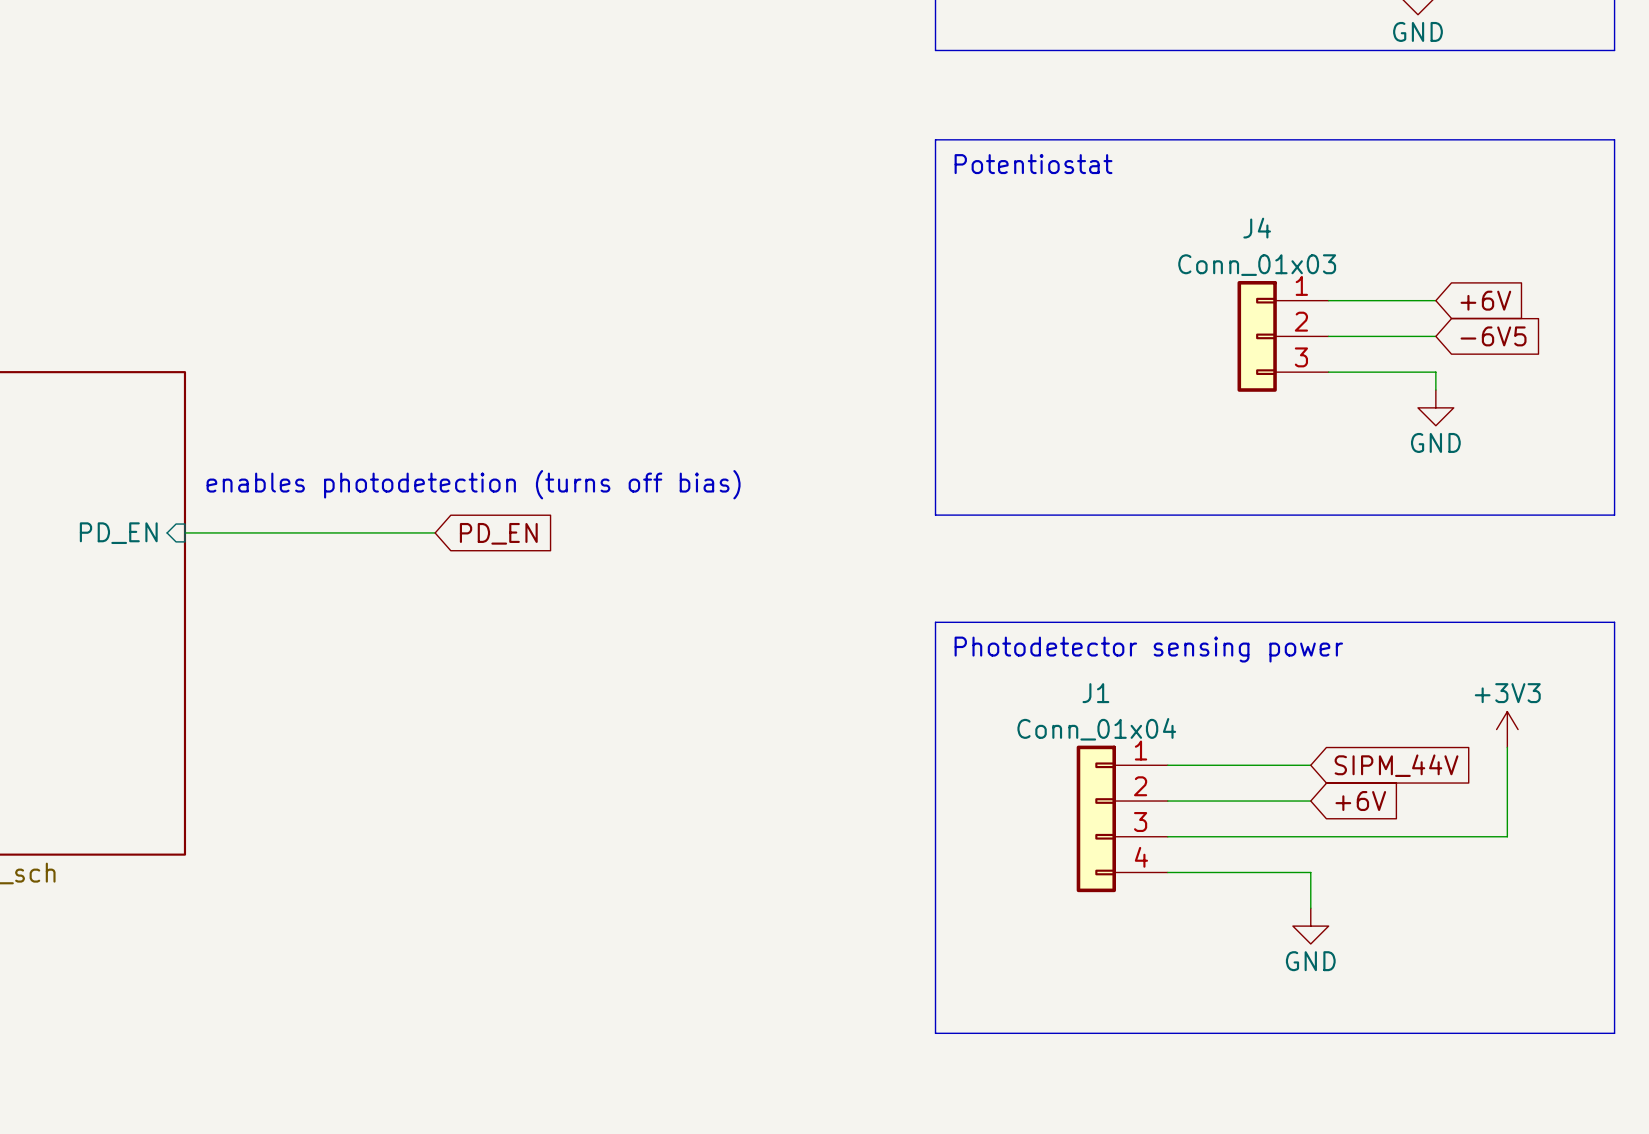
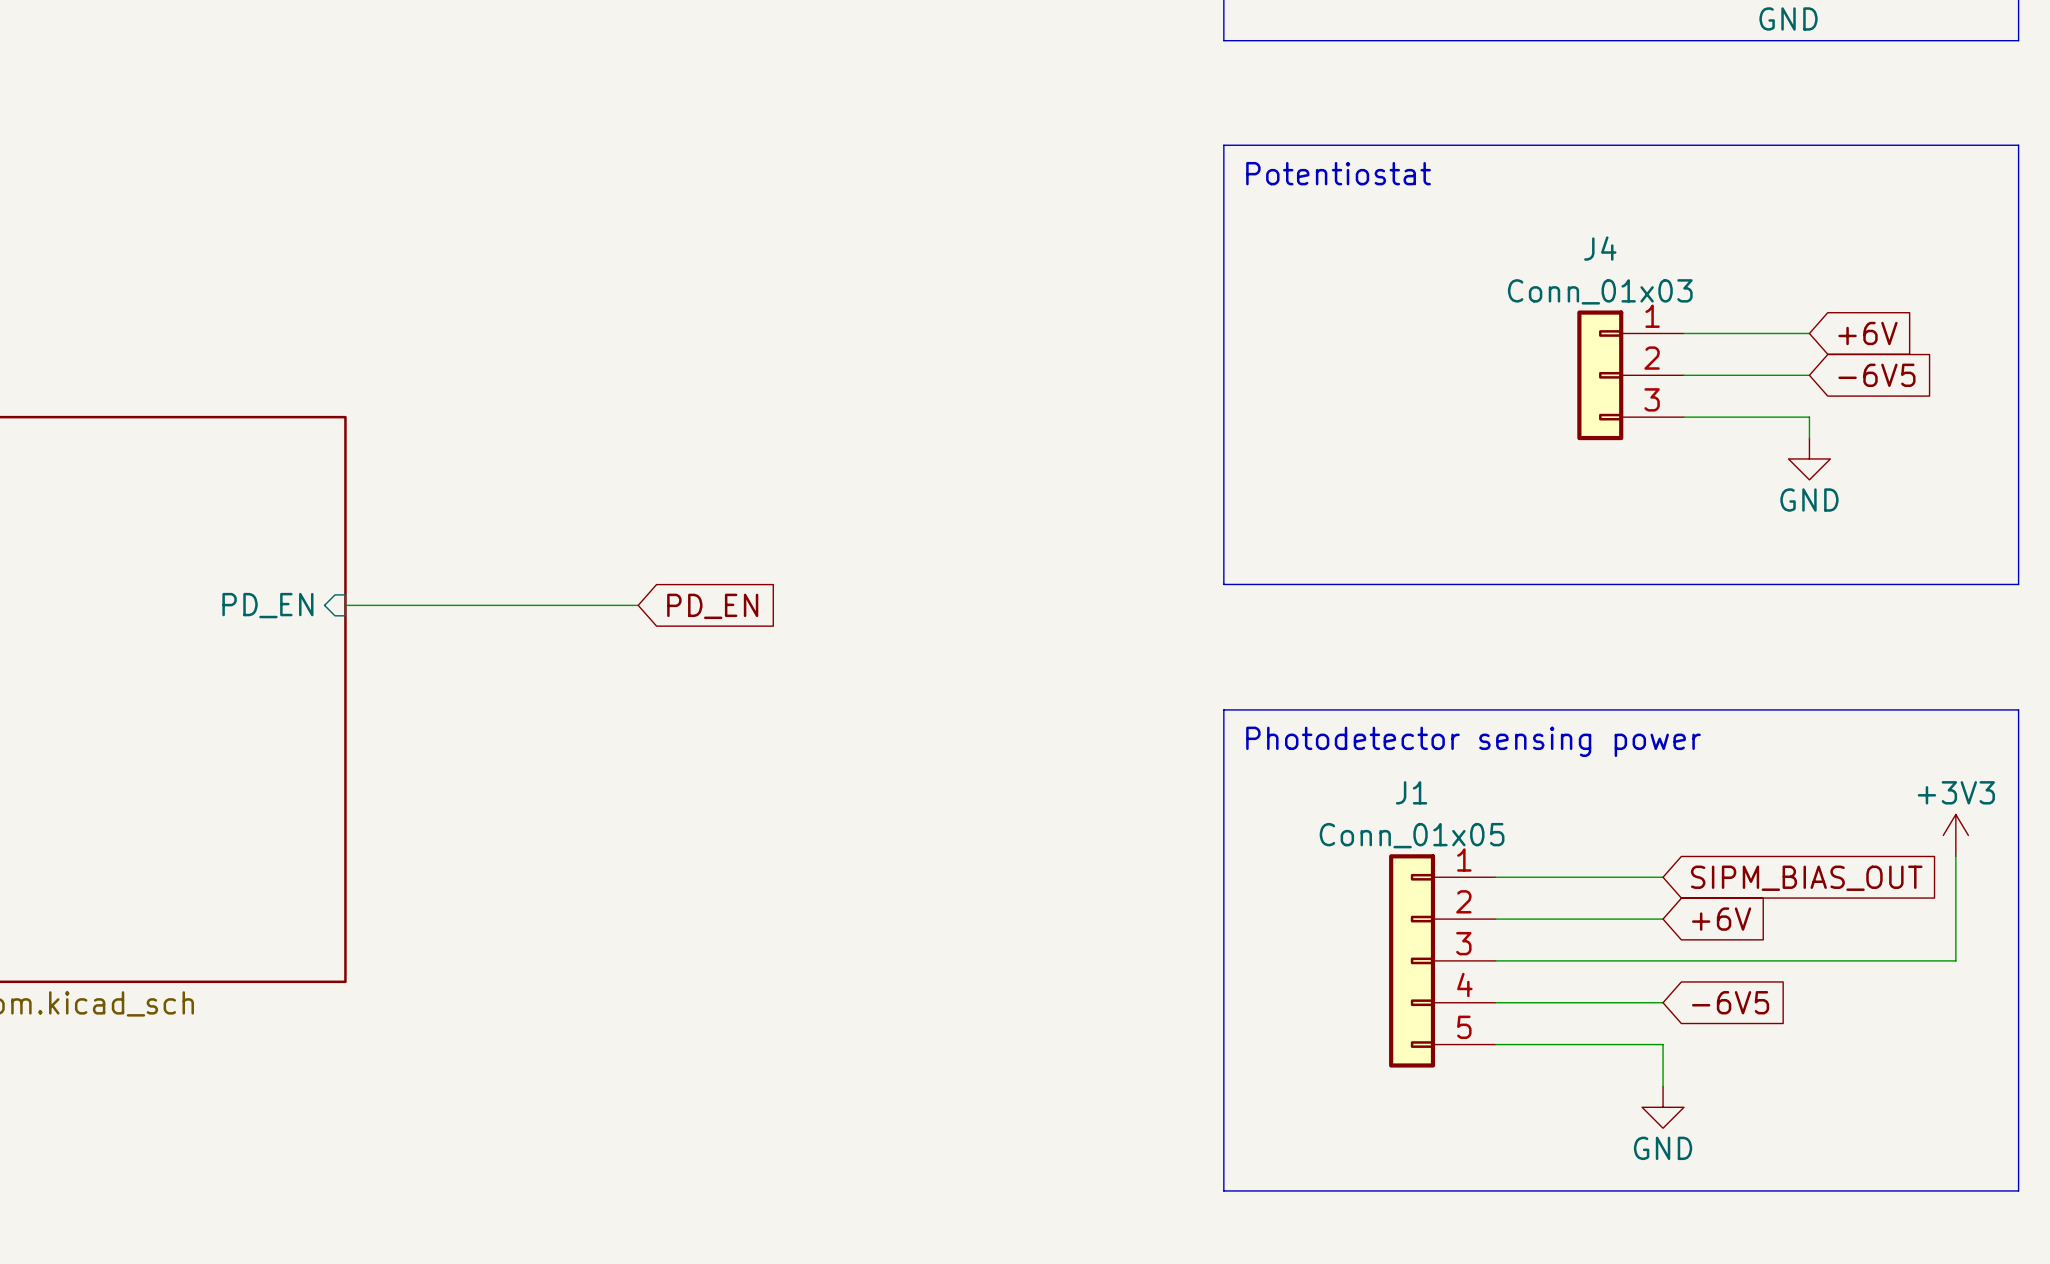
text: enables photodetection (turns off bias) (473, 484) -> none
J1 value: Conn_01x04 (1096, 729) -> Conn_01x05 (1412, 835)
power symbol position: +3V3 (1507, 729) -> +3V3 (1955, 835)
J1 symbol: [1076, 745, 1168, 893] -> [1389, 854, 1496, 1068]
wire: (1507, 747) (1507, 836) -> (1955, 856) (1955, 960) (1893, 960)
global label: SIPM_44V (1396, 765) -> SIPM_BIAS_OUT (1806, 878)
wire: (1310, 872) (1310, 908) -> none
global label: none -> -6V5 (1730, 1002)
wire: none -> (1495, 1044) (1663, 1044) (1663, 1086)
power symbol position: GND (1310, 926) -> GND (1663, 1107)

